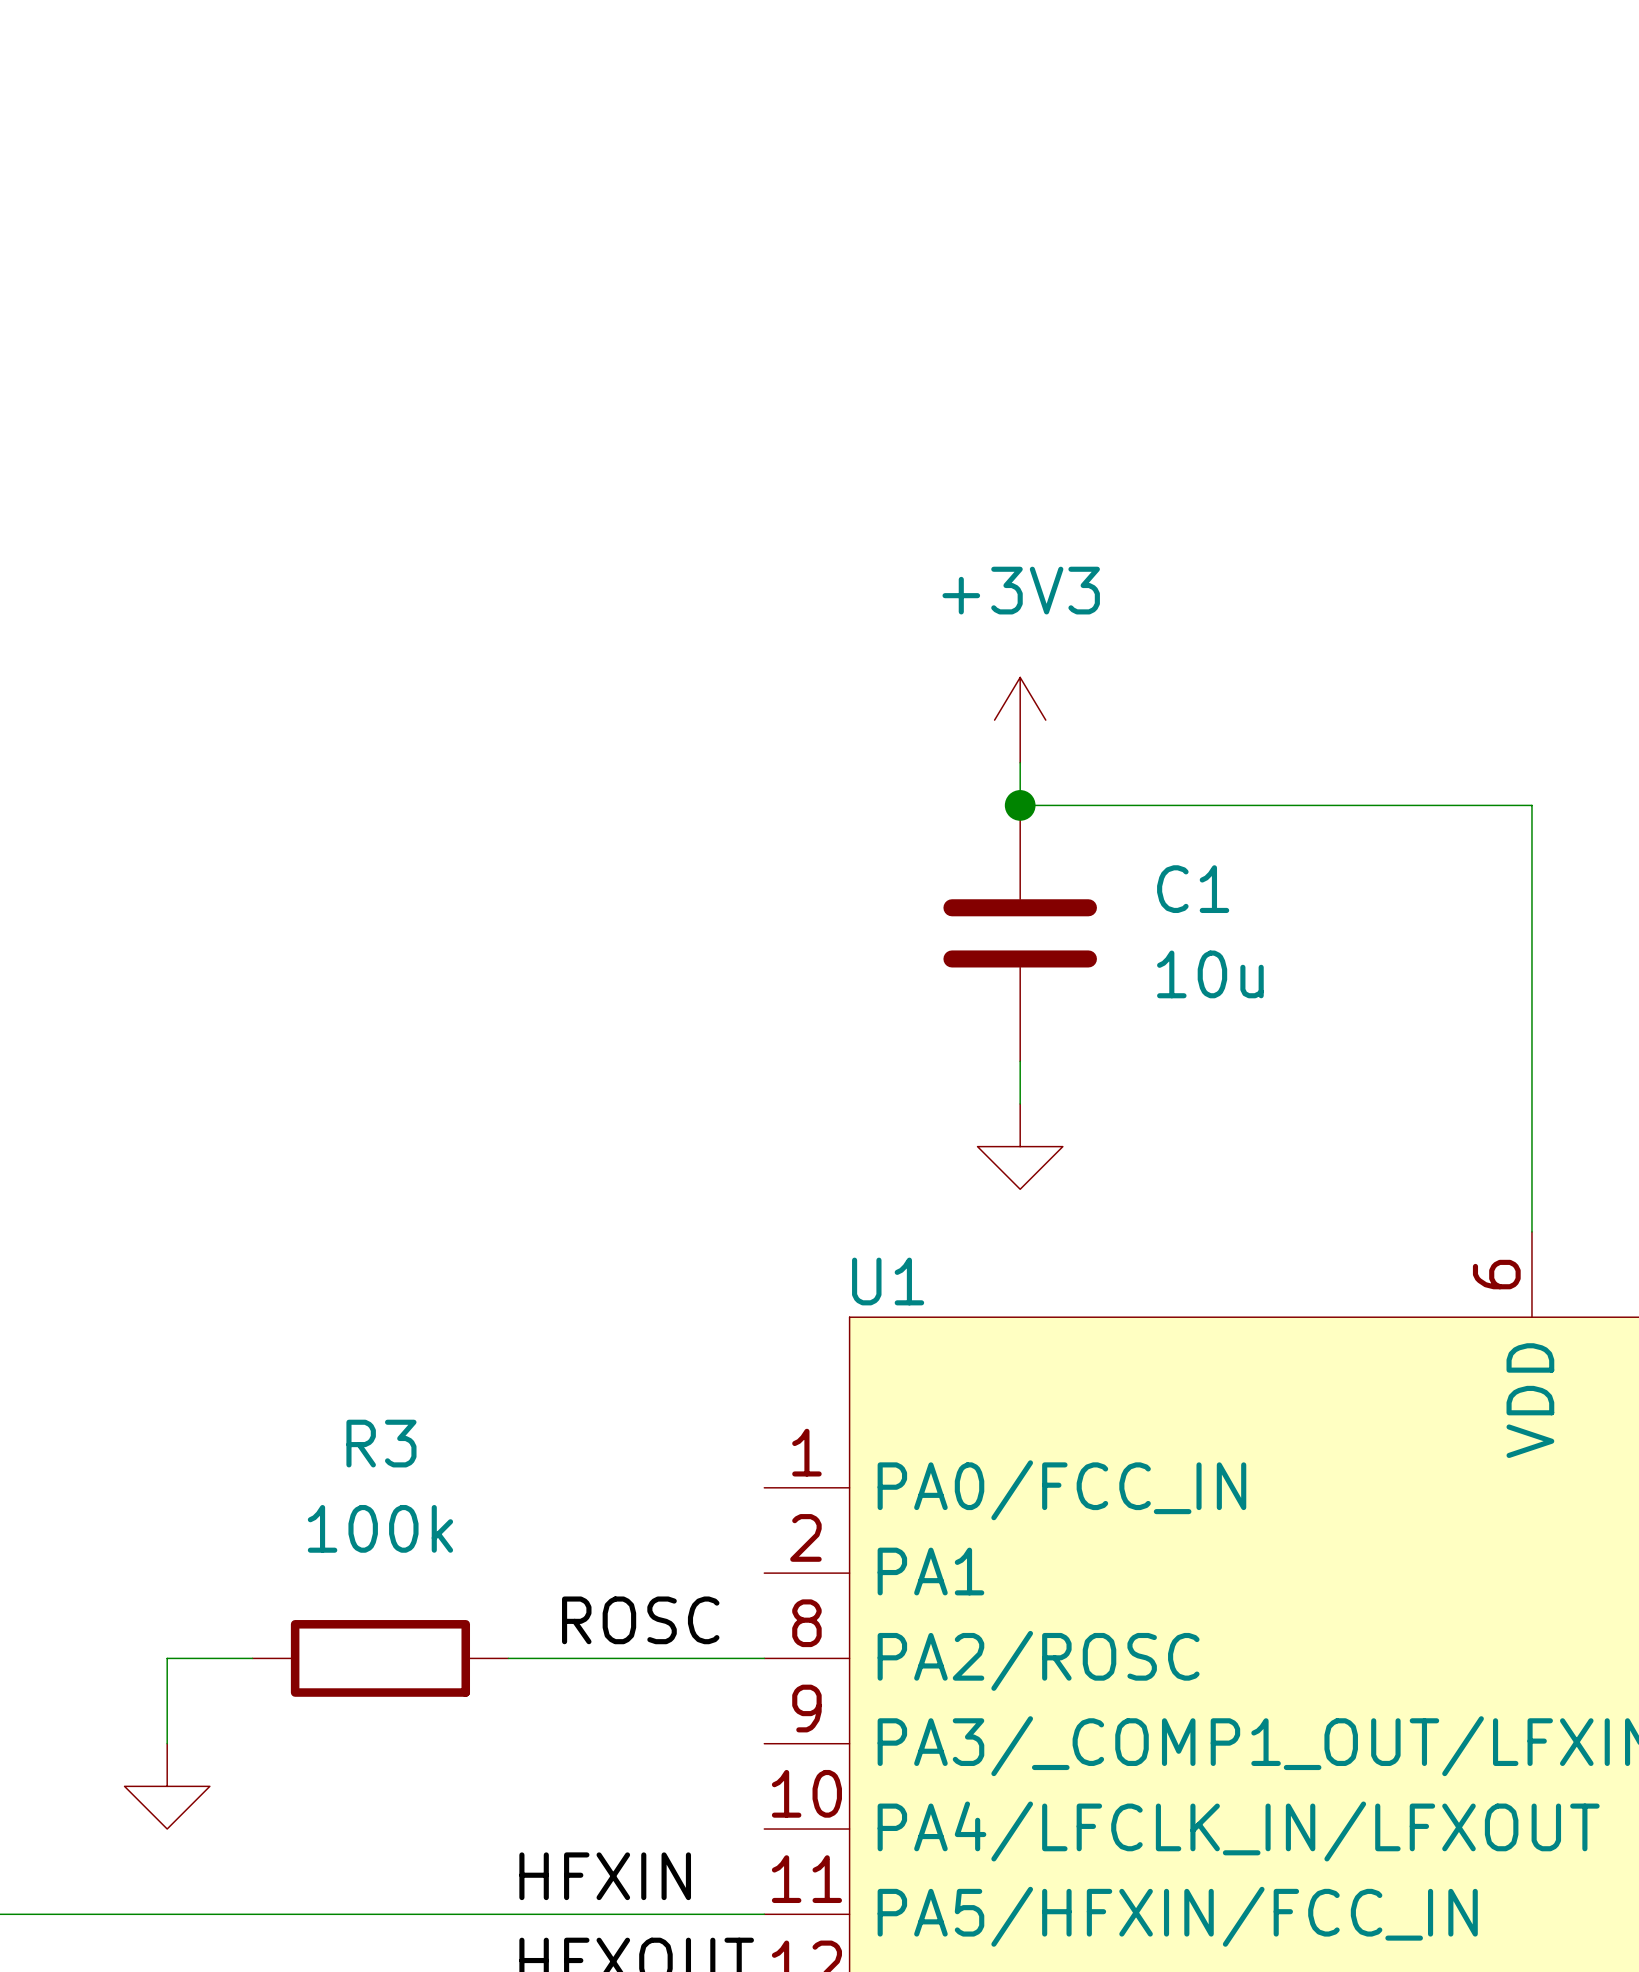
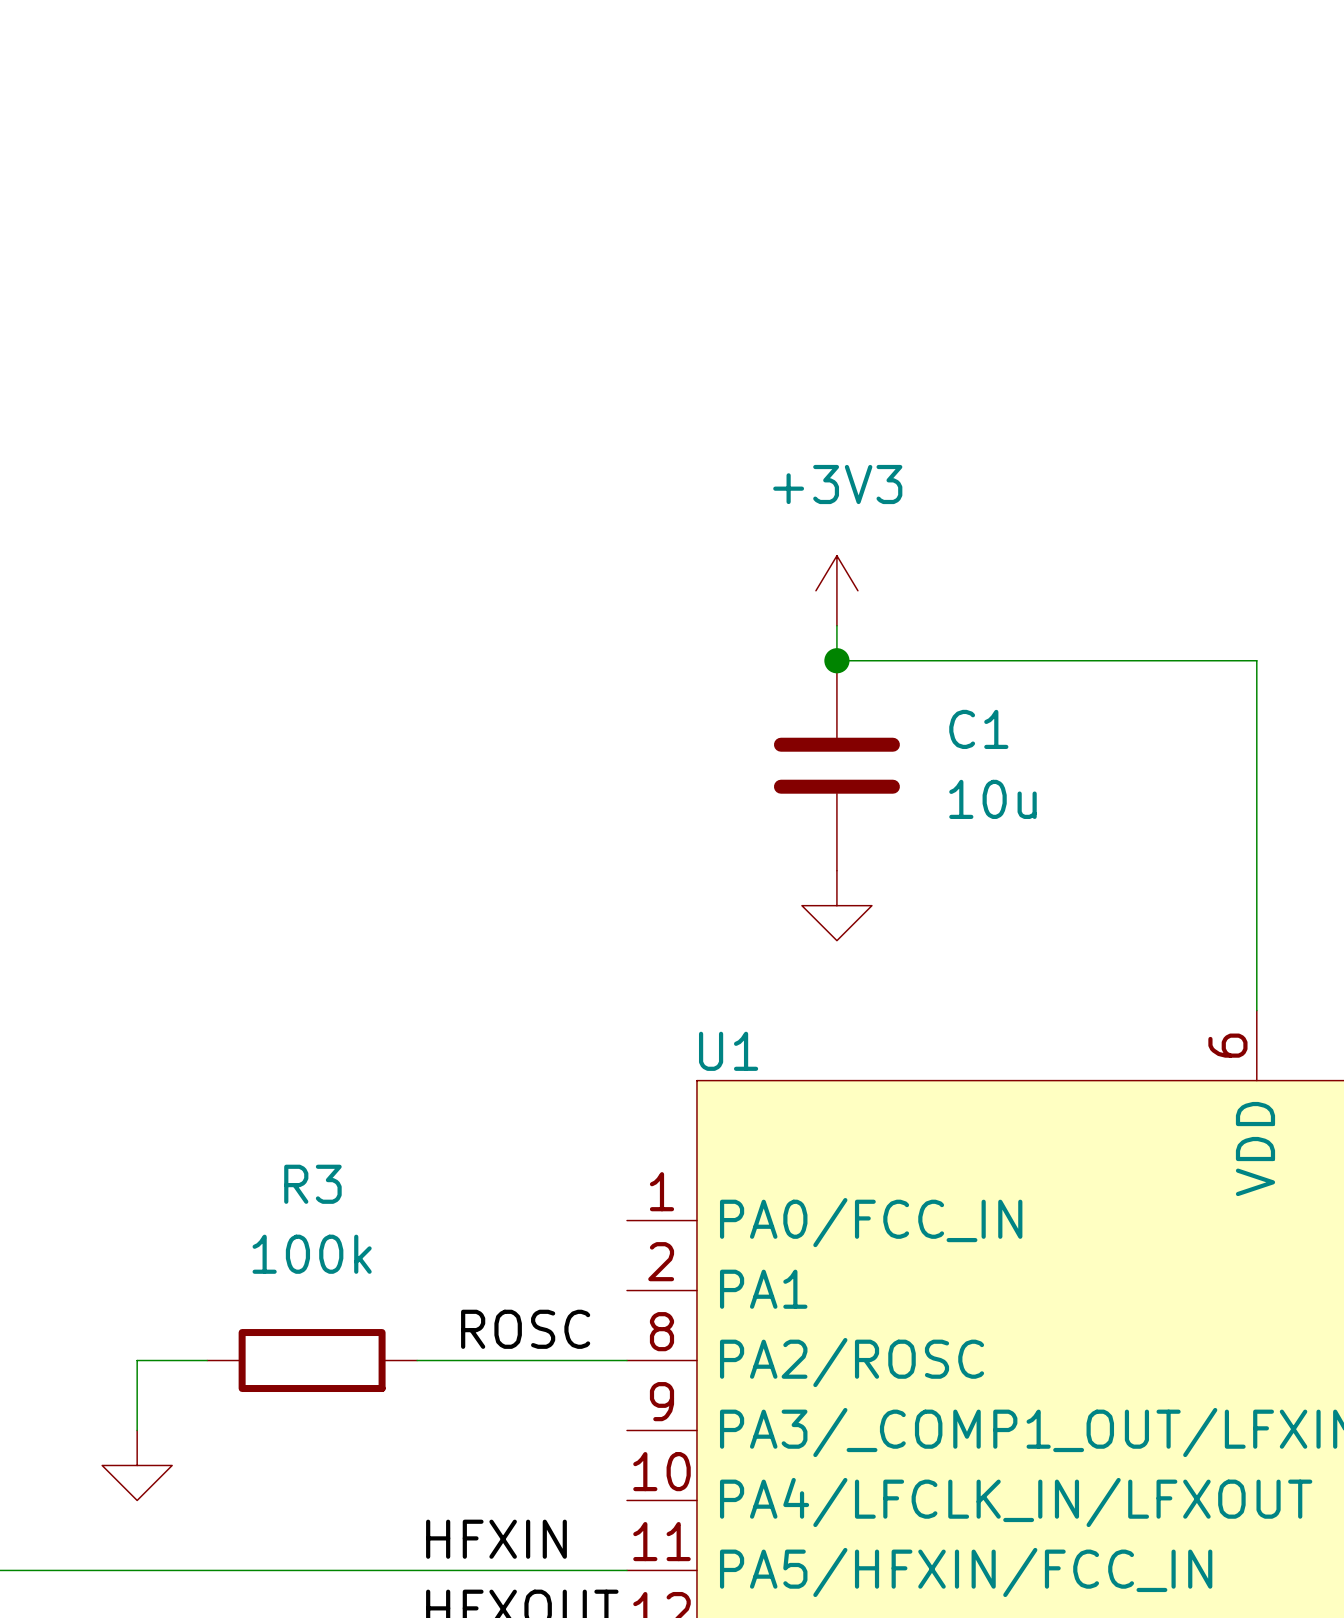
power symbol position: (1020, 1146) -> (836, 905)

